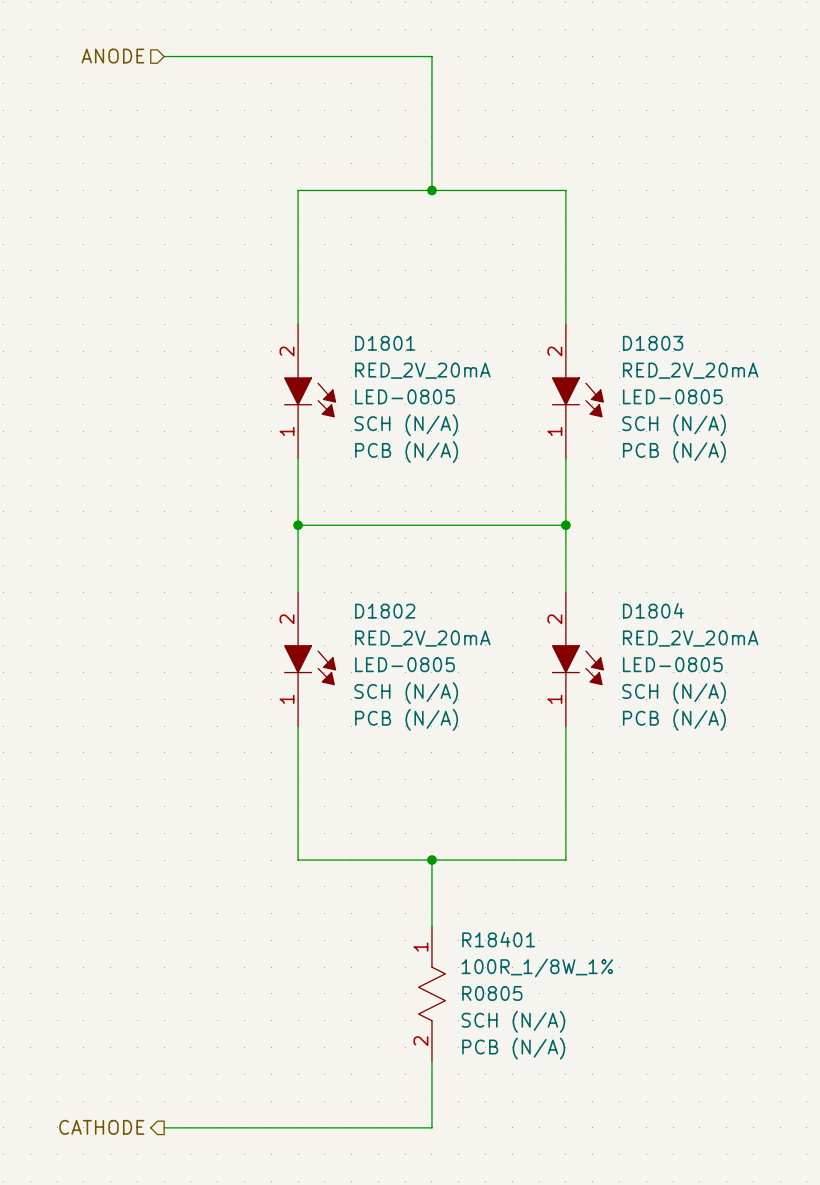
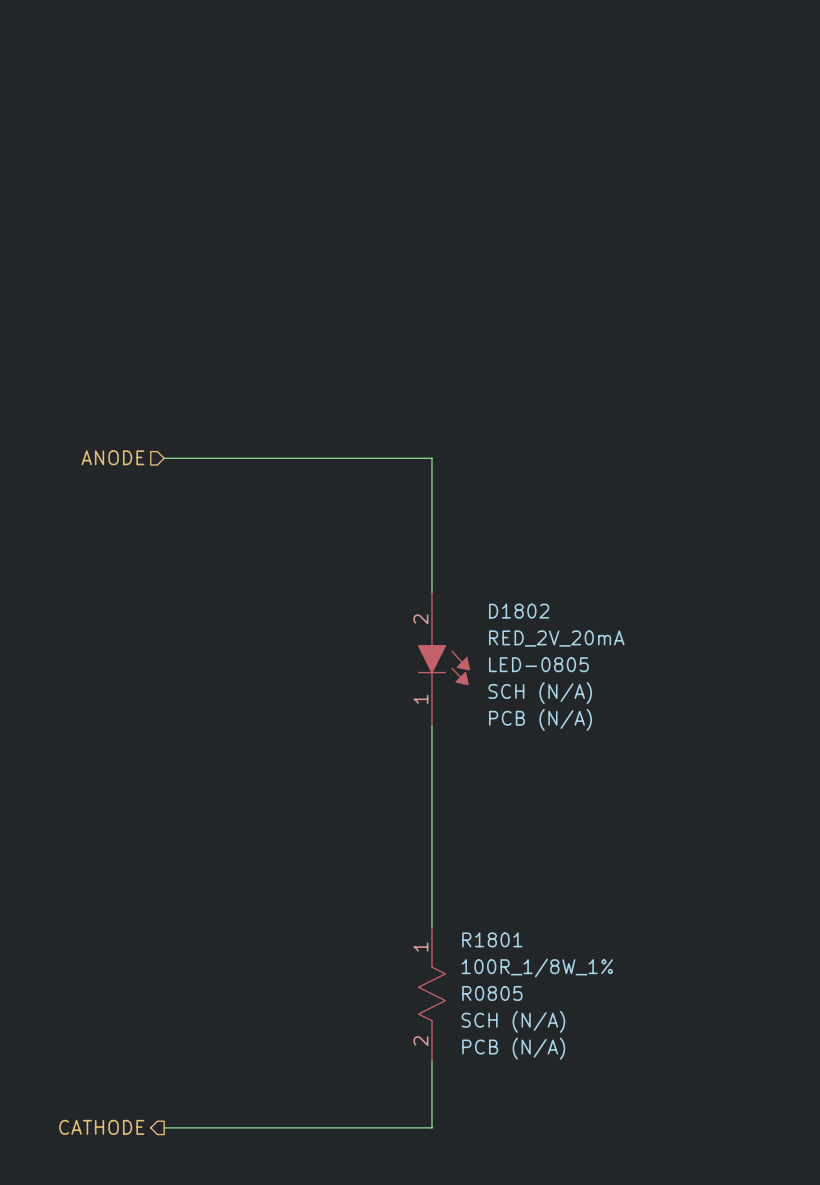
hierarchical label: ANODE (112, 56) -> none
wire: (164, 56) (431, 56) (431, 190) -> none
junction: (431, 190) -> none
wire: (298, 324) (298, 190) (565, 190) (565, 324) -> none
D1801: RED_2V_20mA (310, 391) -> none
D1803: RED_2V_20mA (577, 391) -> none
hierarchical label: none -> ANODE (112, 457)
wire: none -> (164, 458) (431, 458) (431, 592)
wire: (298, 458) (298, 592) -> none
wire: (565, 458) (565, 592) -> none
wire: (298, 525) (565, 525) -> none
junction: (298, 525) -> none
junction: (565, 525) -> none
D1802 position: (310, 659) -> (444, 659)
D1804: RED_2V_20mA (577, 659) -> none
wire: (298, 726) (298, 860) (565, 860) (565, 726) -> none
wire: none -> (431, 726) (431, 860)
junction: (431, 860) -> none
R18401 name: R18401 (498, 939) -> R1801 (492, 939)

